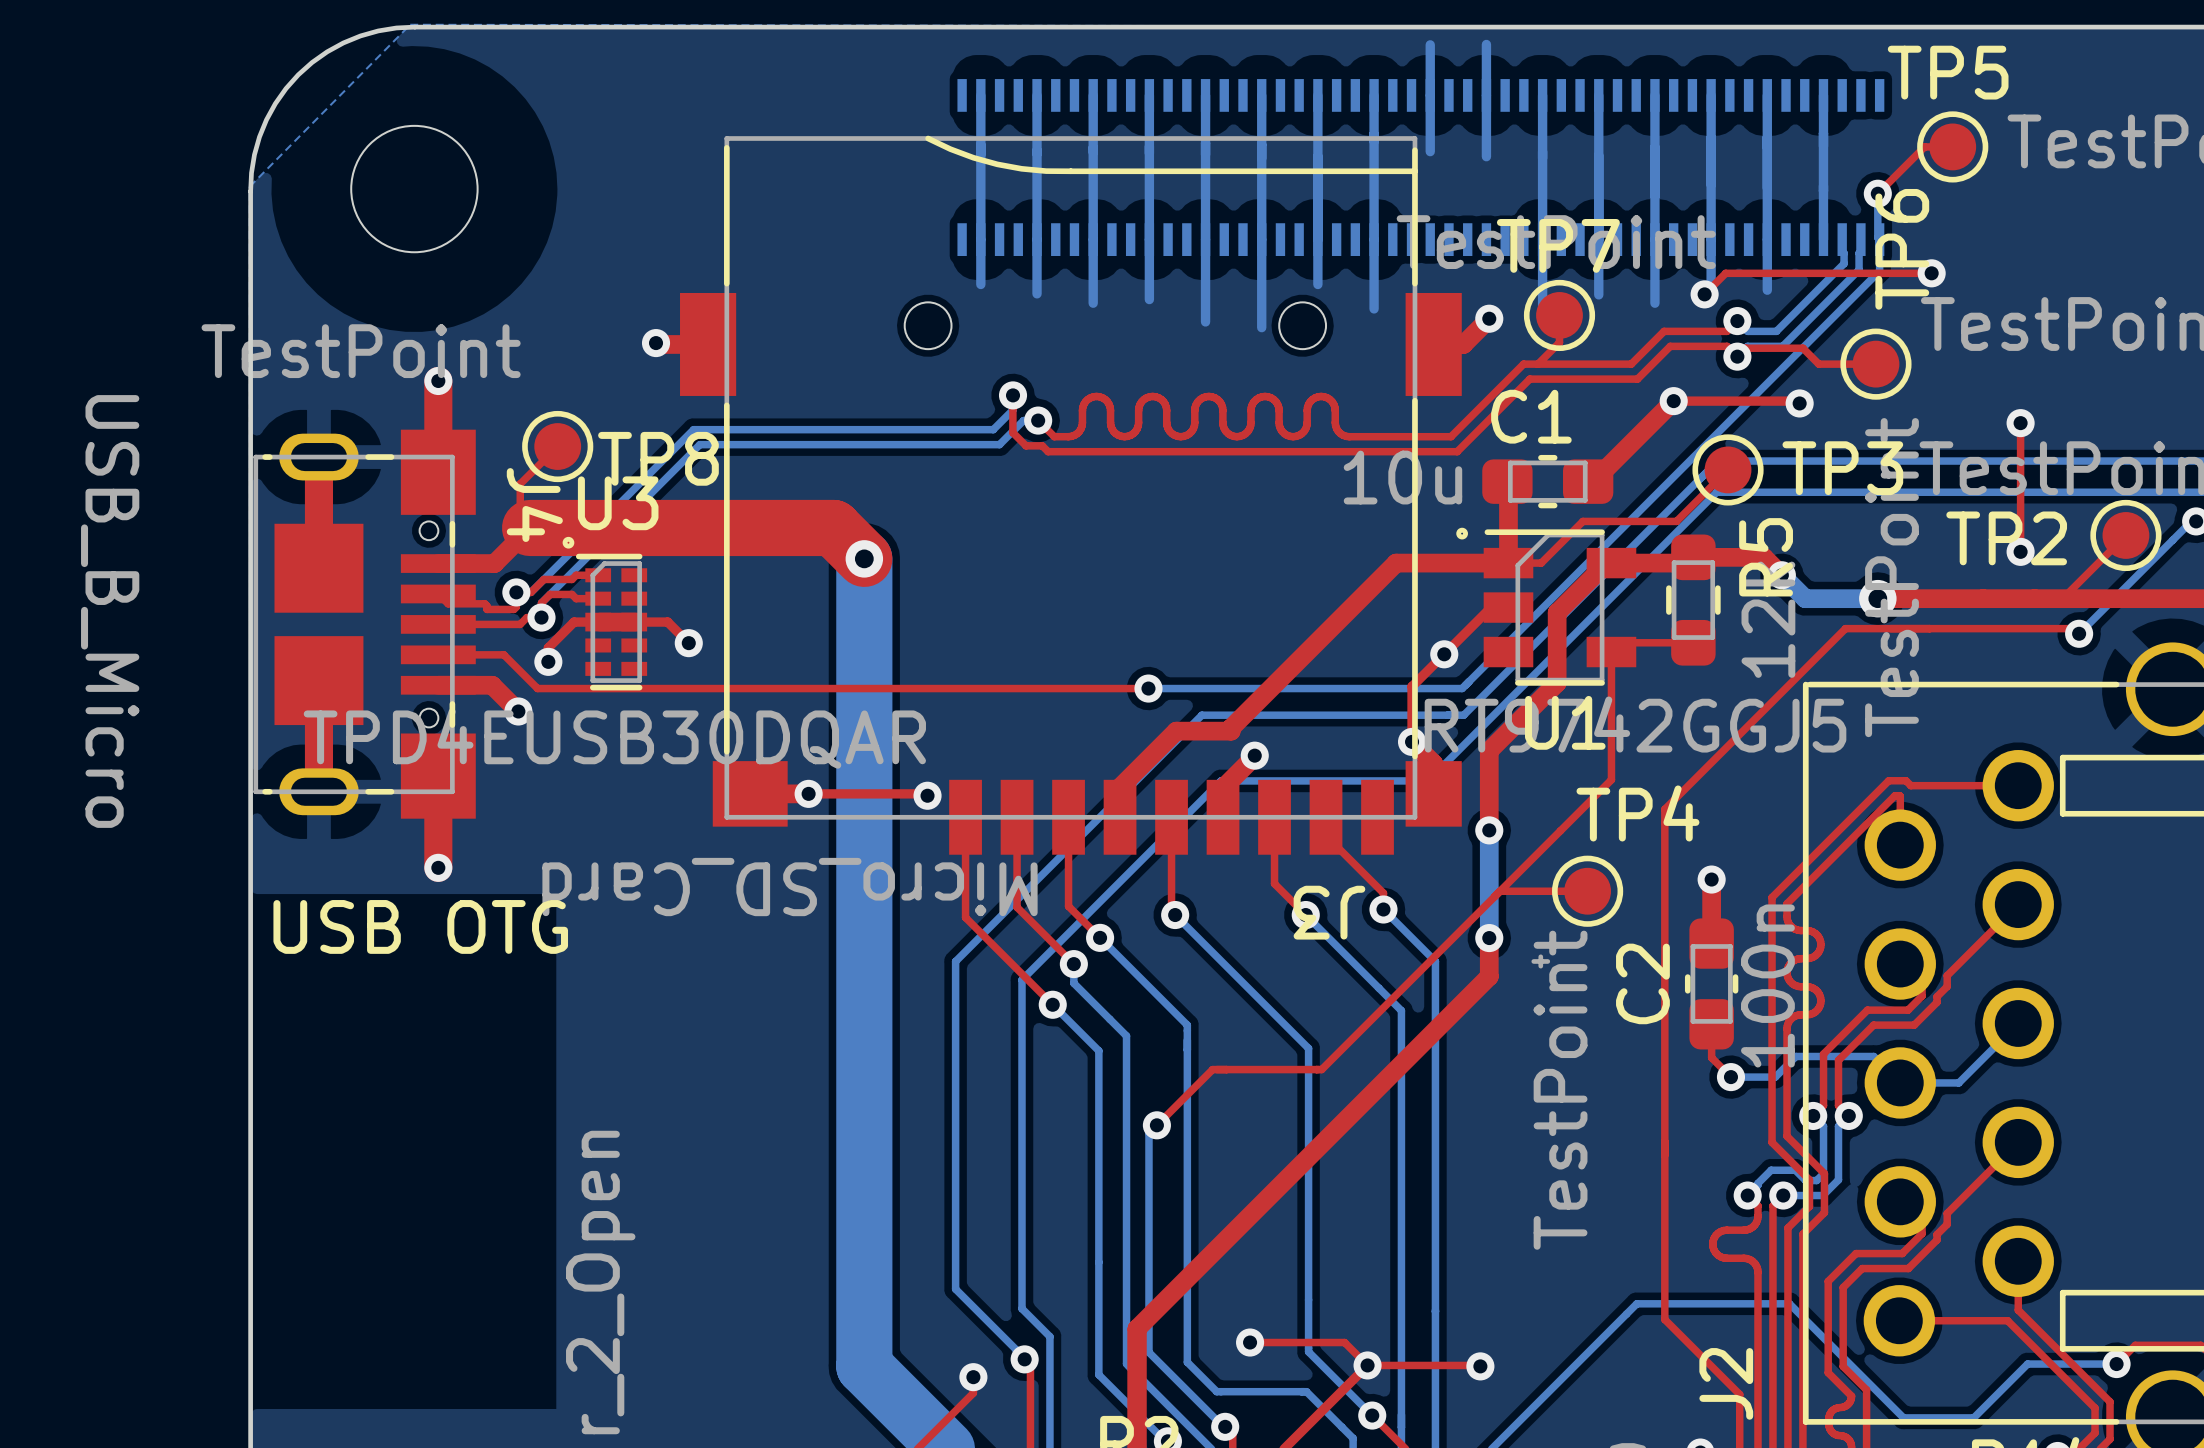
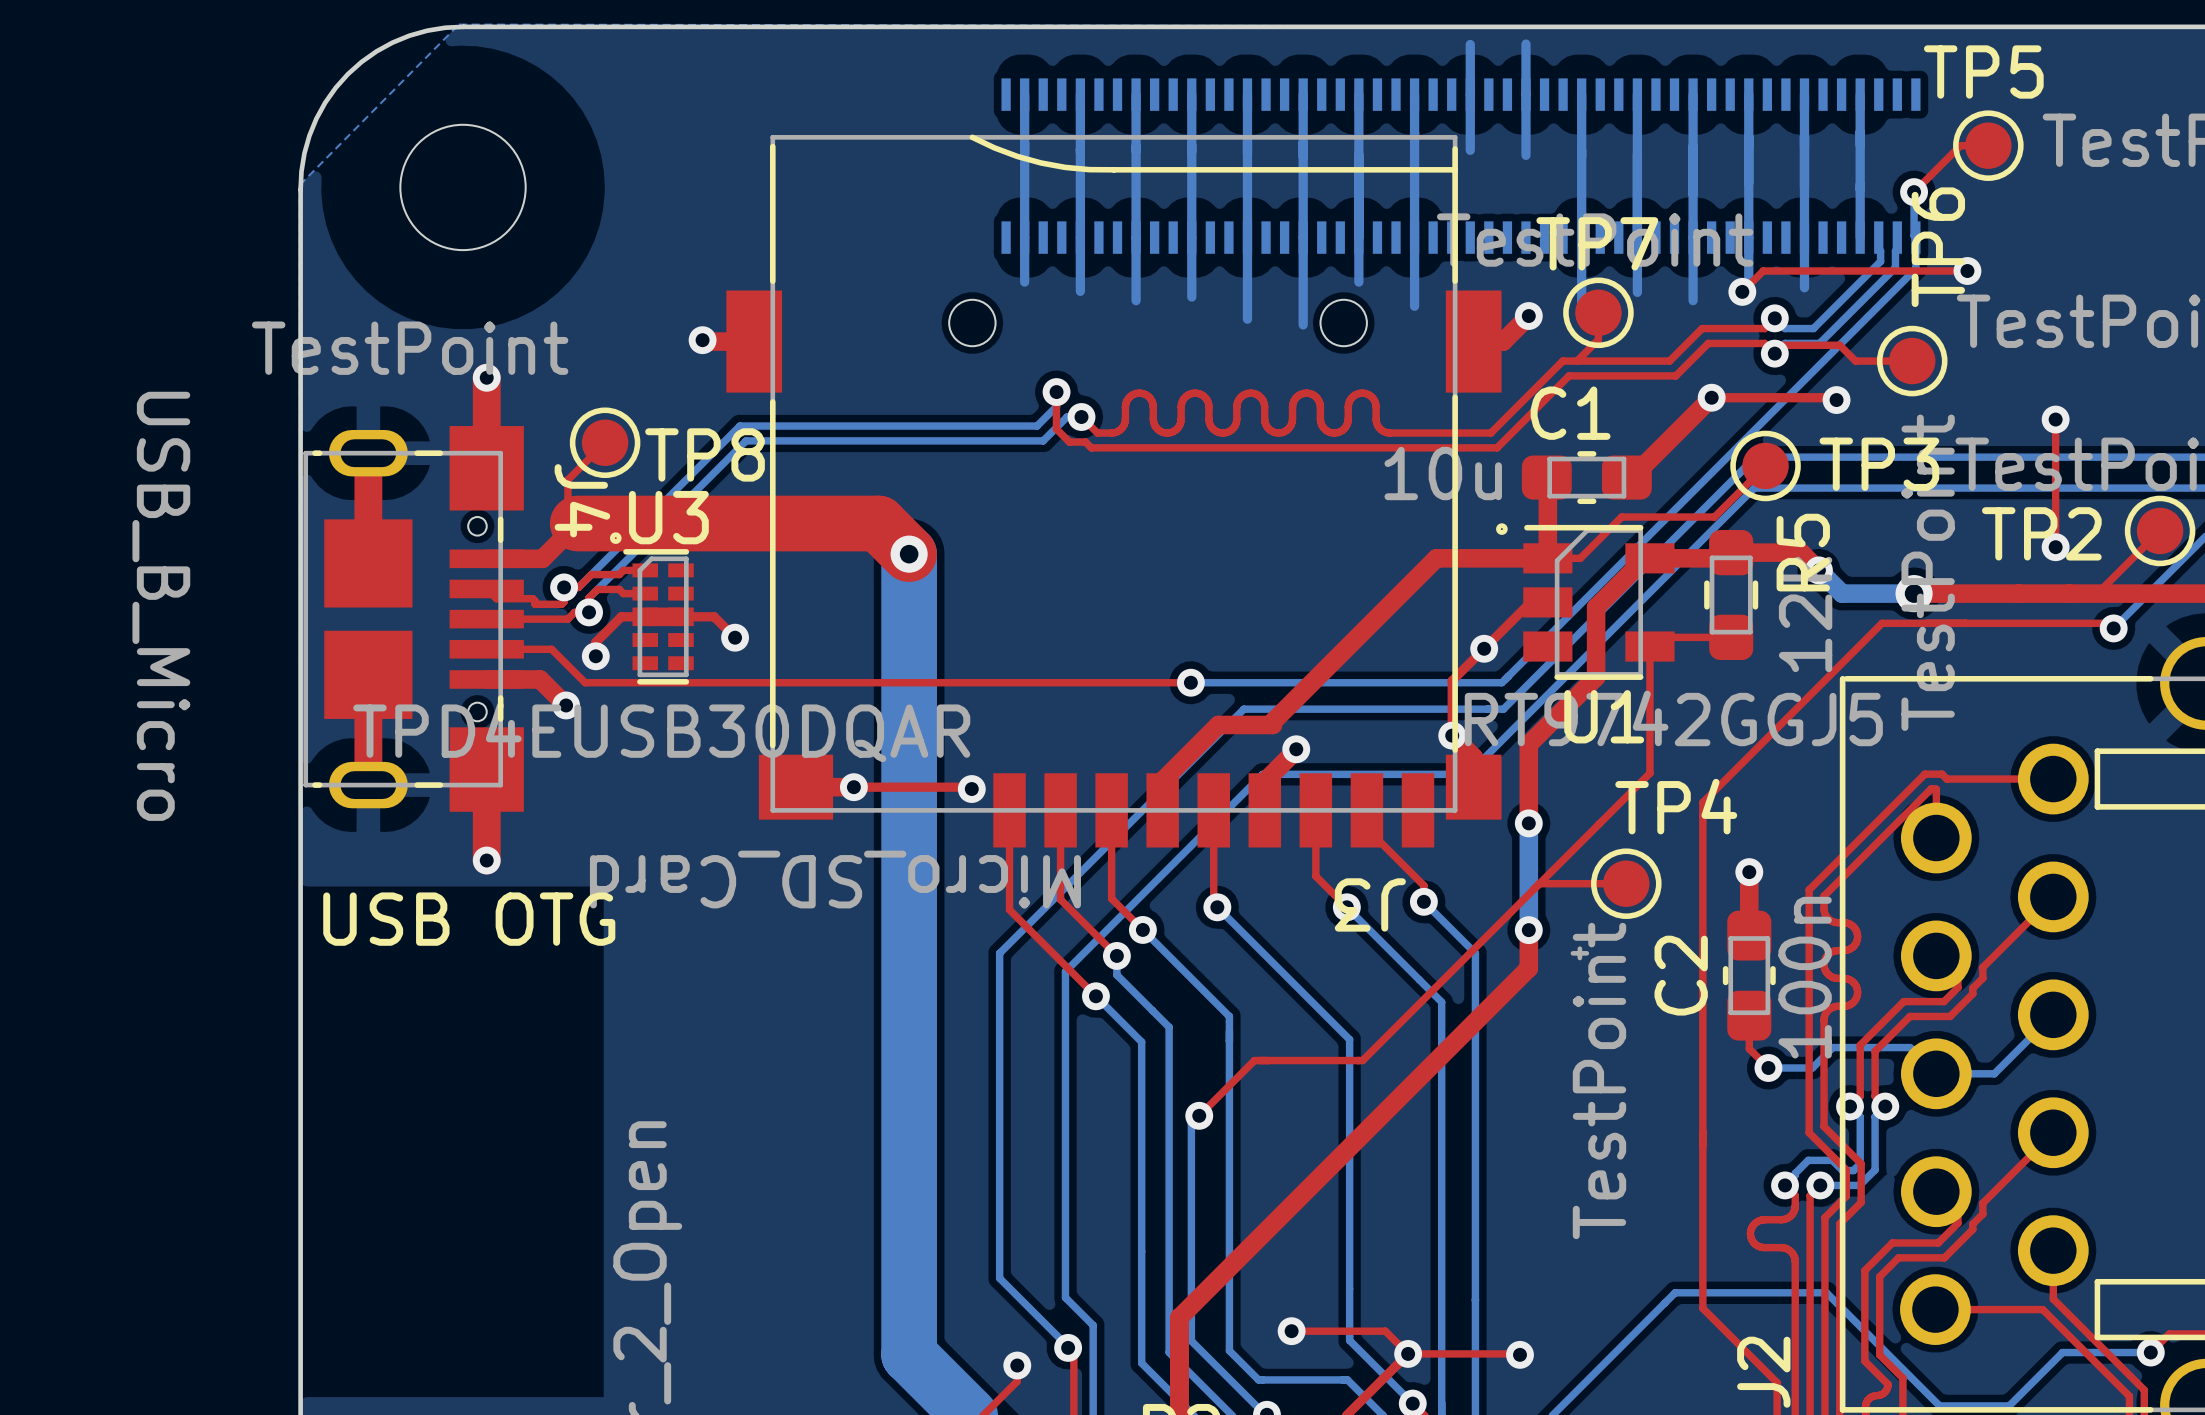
U3 name position: U3 (618, 503) -> U3 (668, 517)

